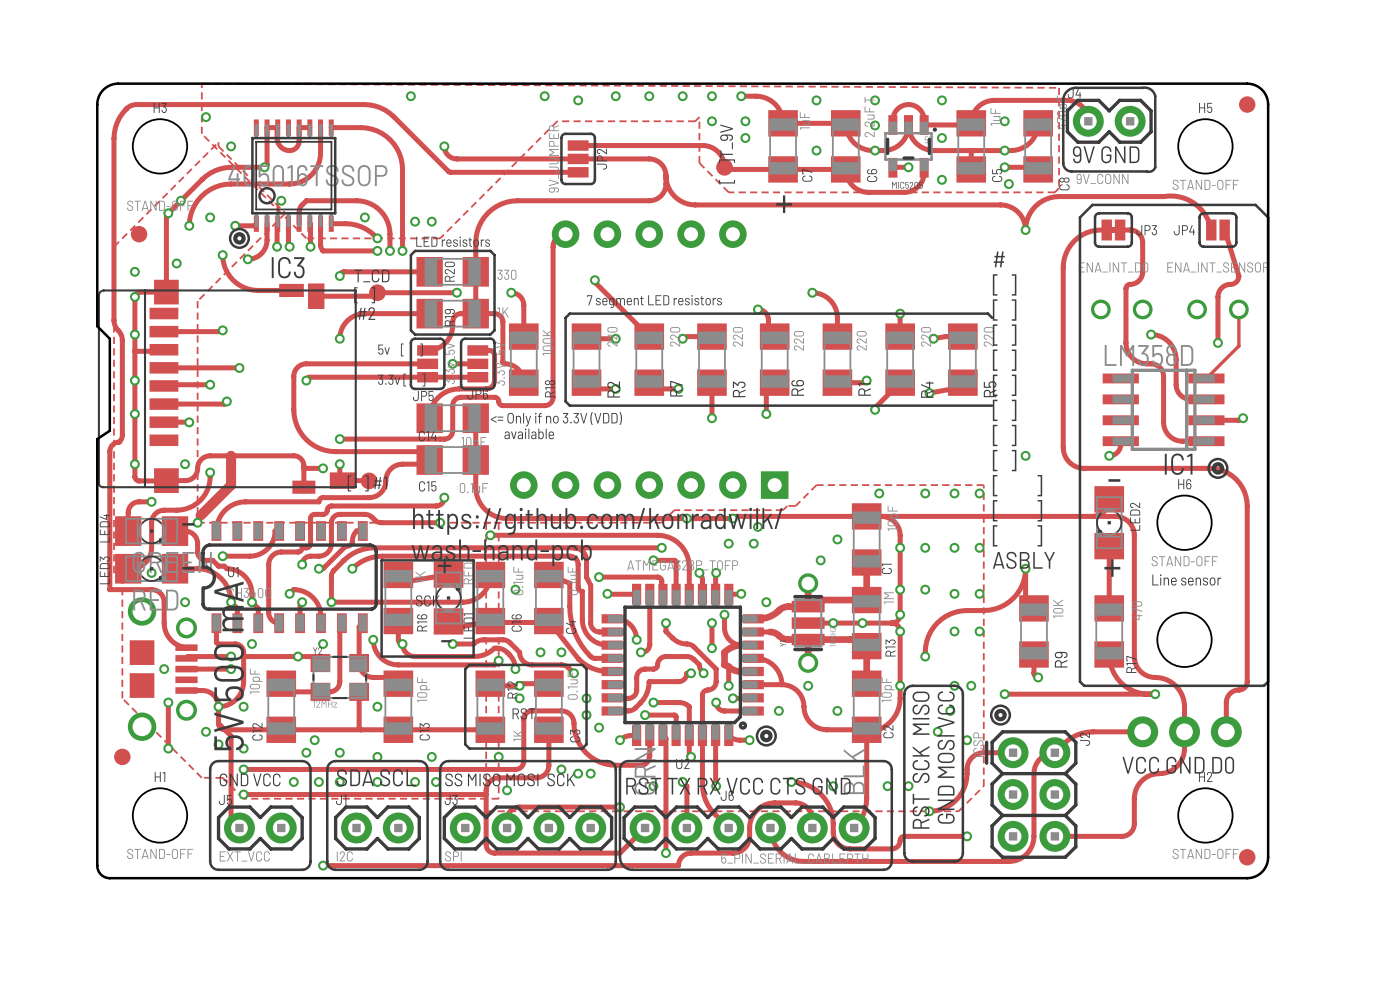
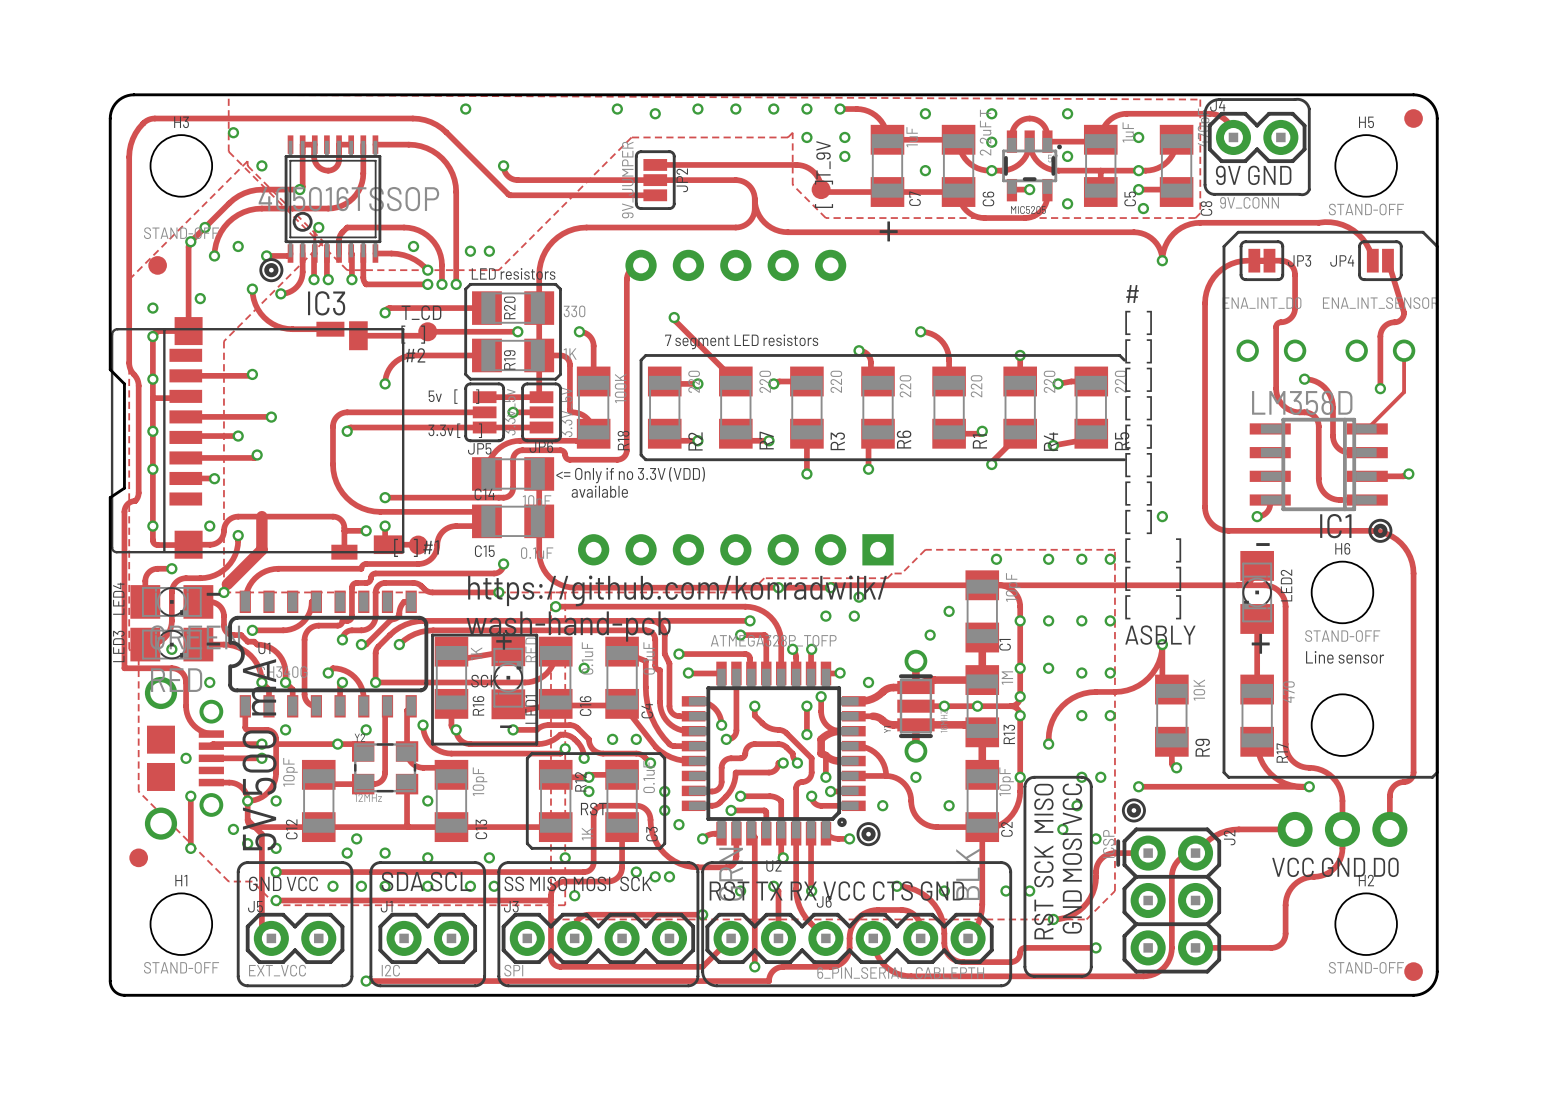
track: (475, 313) (455, 315) (447, 340) (437, 348) (427, 350) -> (539, 355) (539, 394) (541, 397) (484, 397)
track: (477, 350) (490, 350) (494, 354) (494, 382) (491, 387) (486, 388) -> (593, 433) (579, 440) (550, 440)

